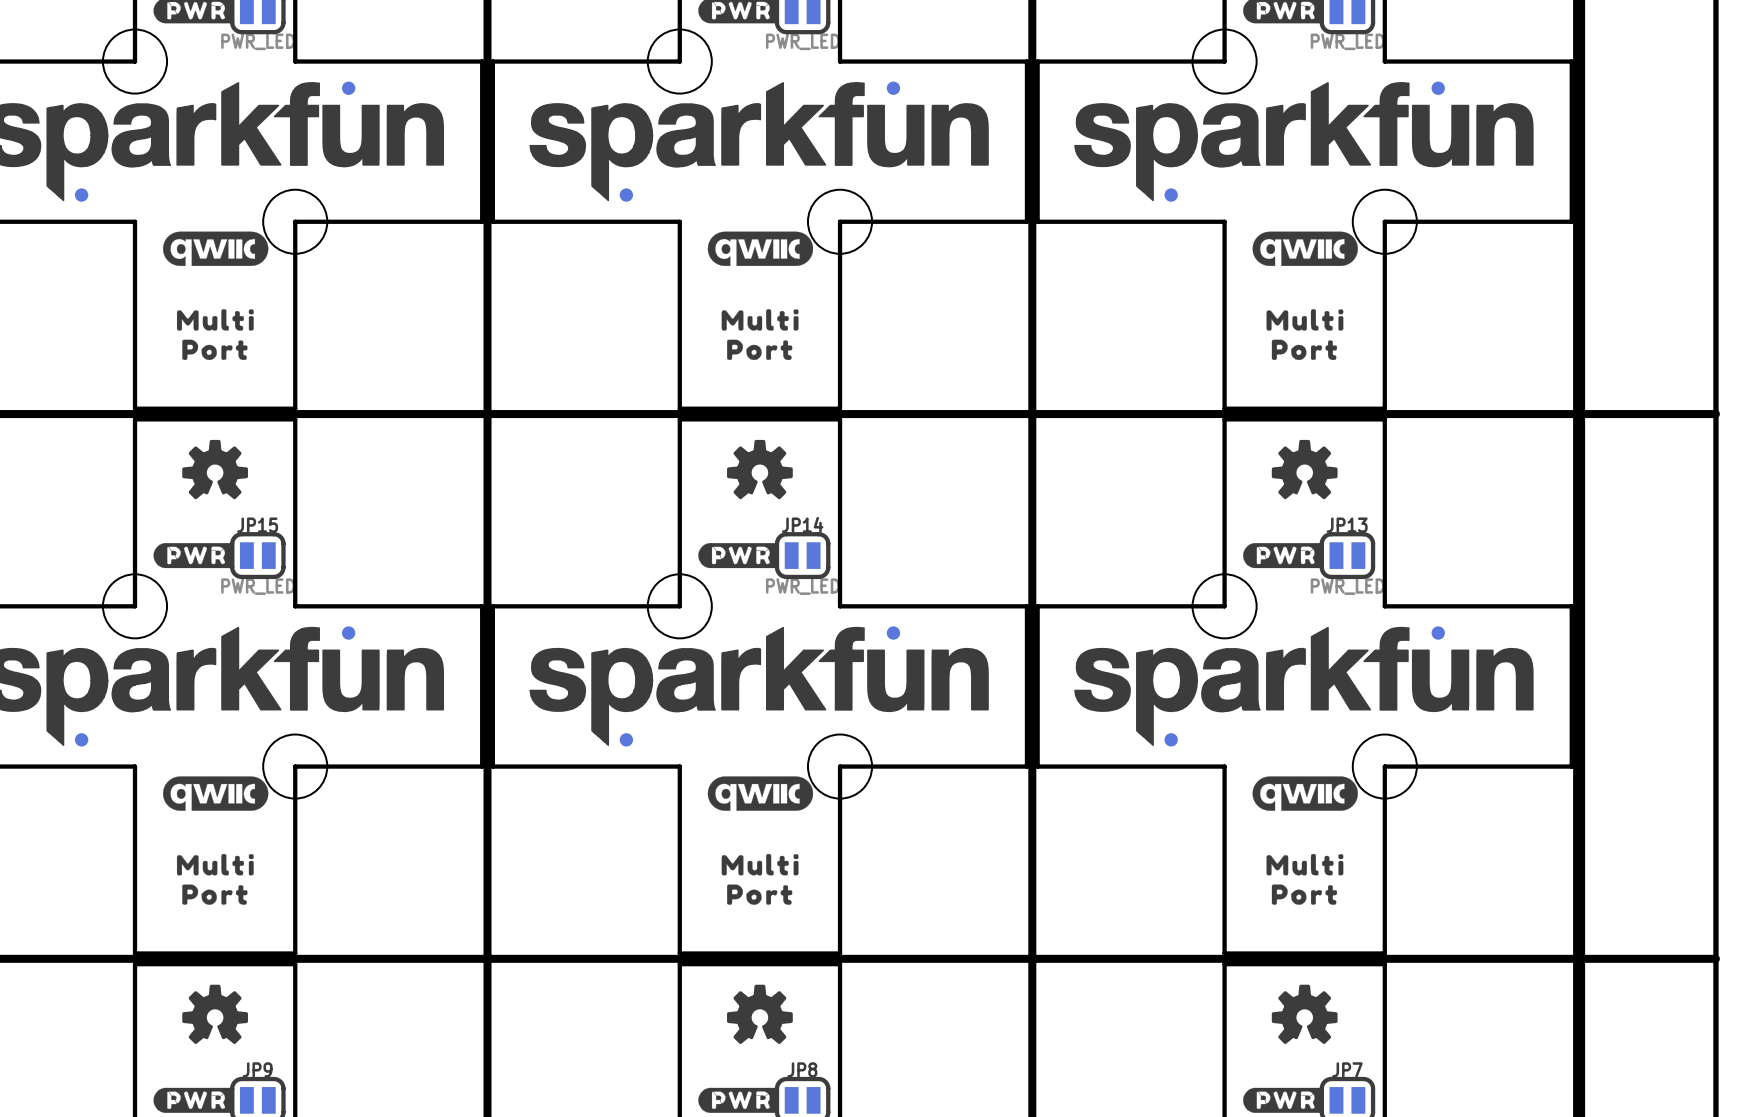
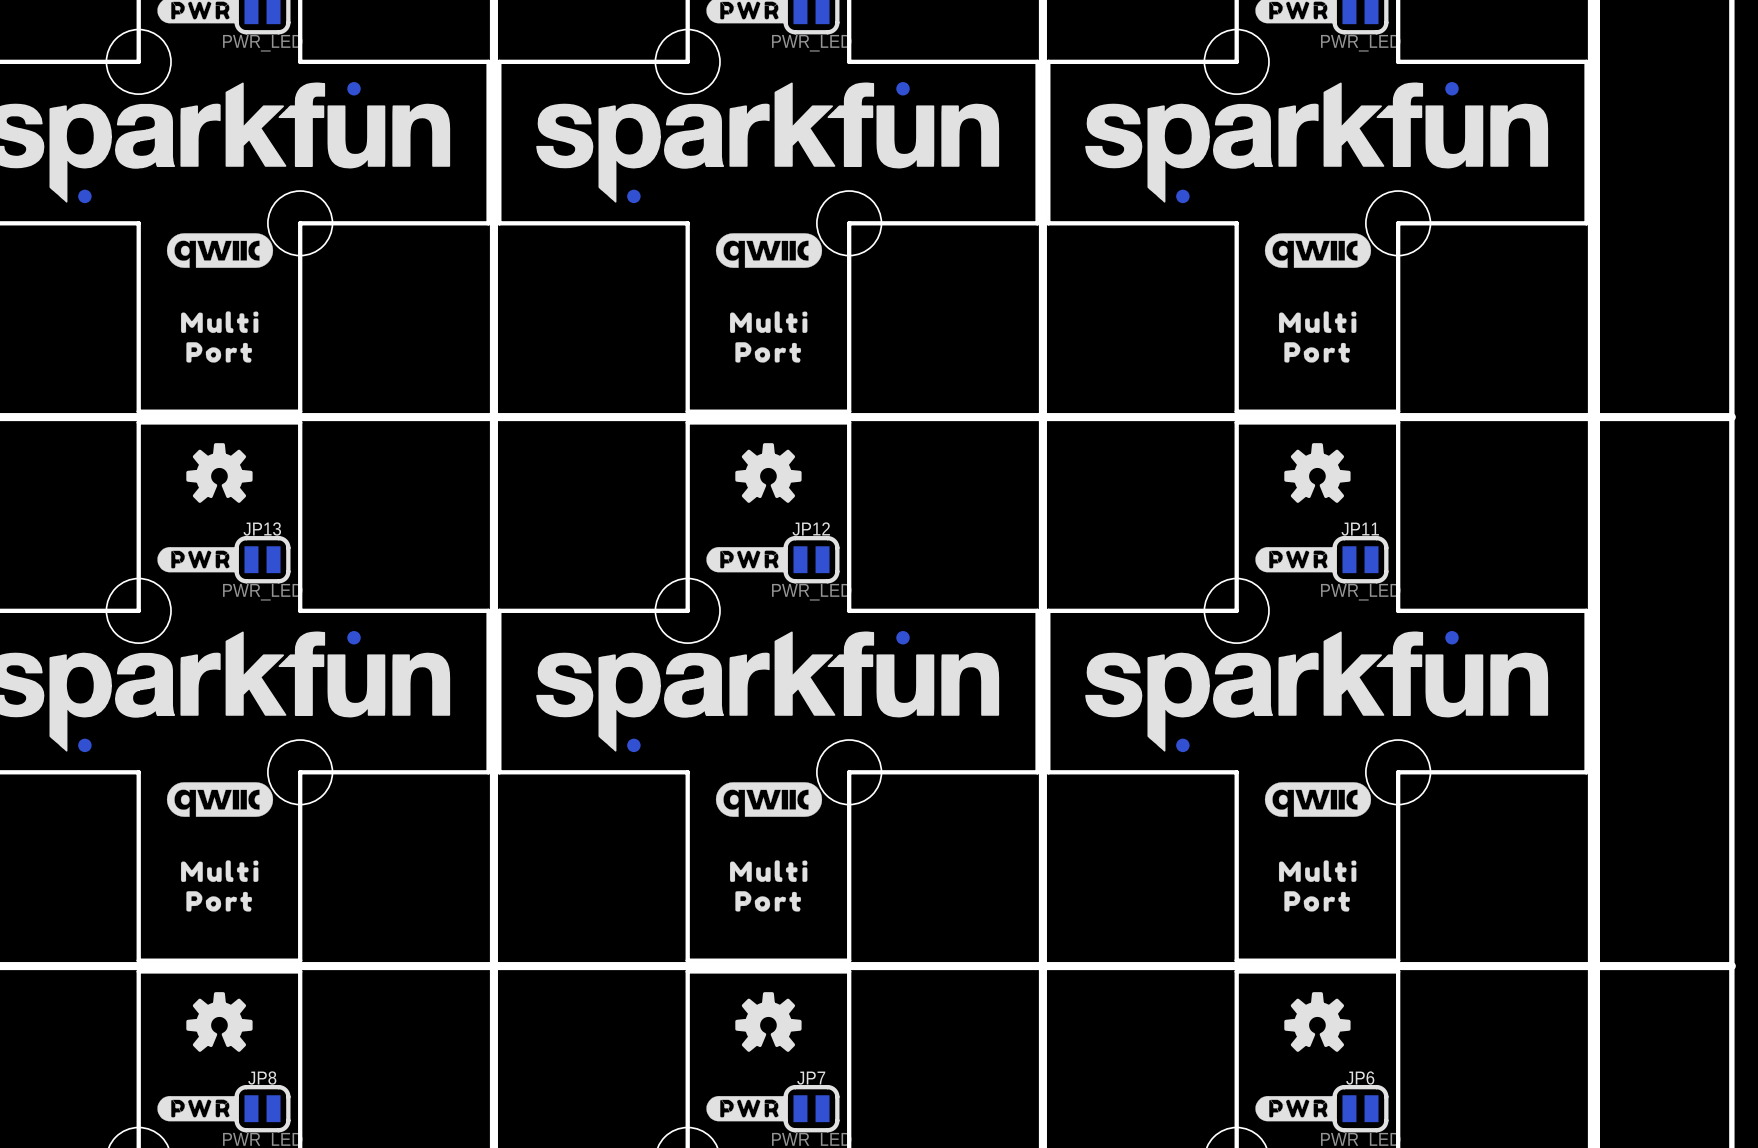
JP14 name: JP14 (802, 524) -> JP12 (811, 529)
JP15 name: JP15 (257, 525) -> JP13 (262, 529)
JP13 name: JP13 (1347, 525) -> JP11 (1360, 529)
JP9 name: JP9 (257, 1069) -> JP8 (262, 1078)
JP8 name: JP8 (802, 1069) -> JP7 (811, 1078)
JP7 name: JP7 (1347, 1069) -> JP6 (1360, 1078)

